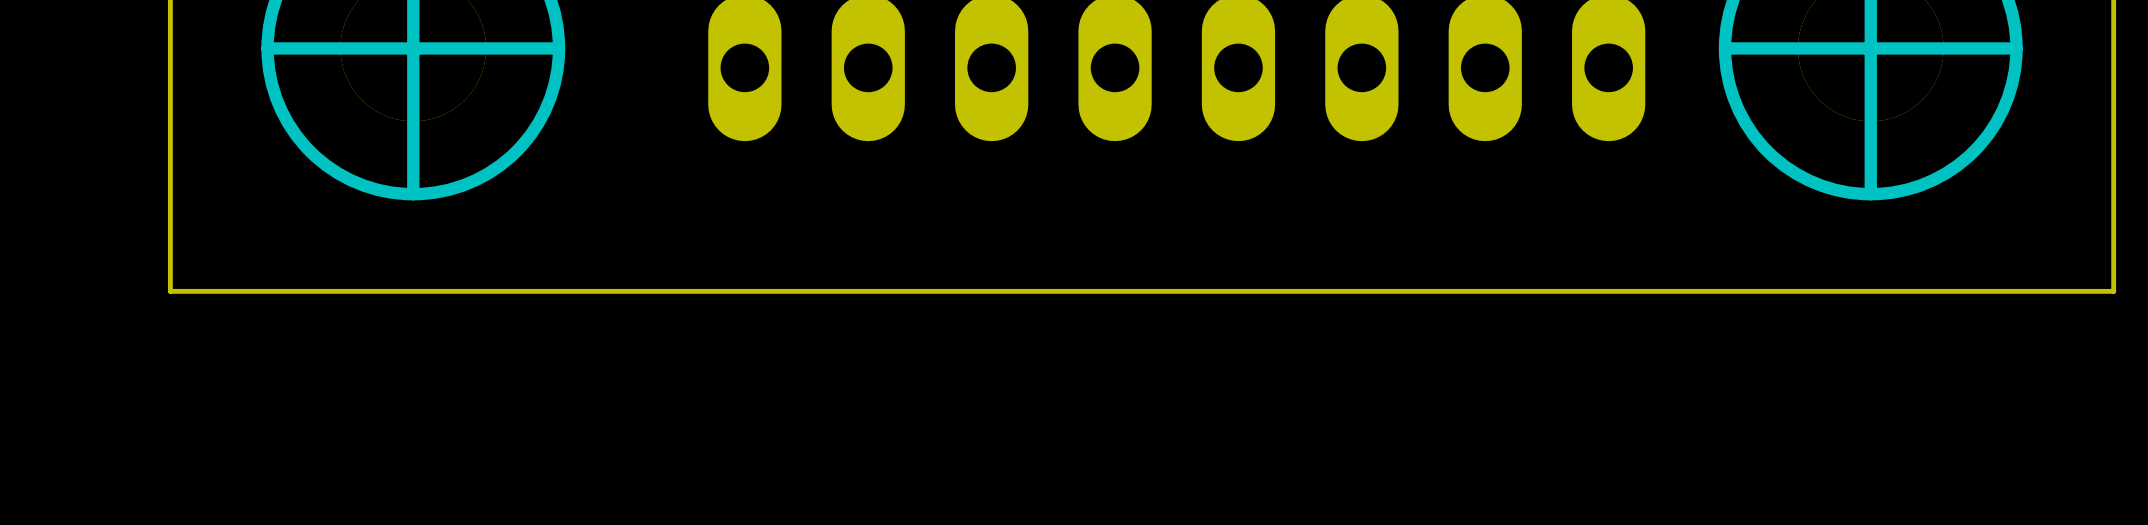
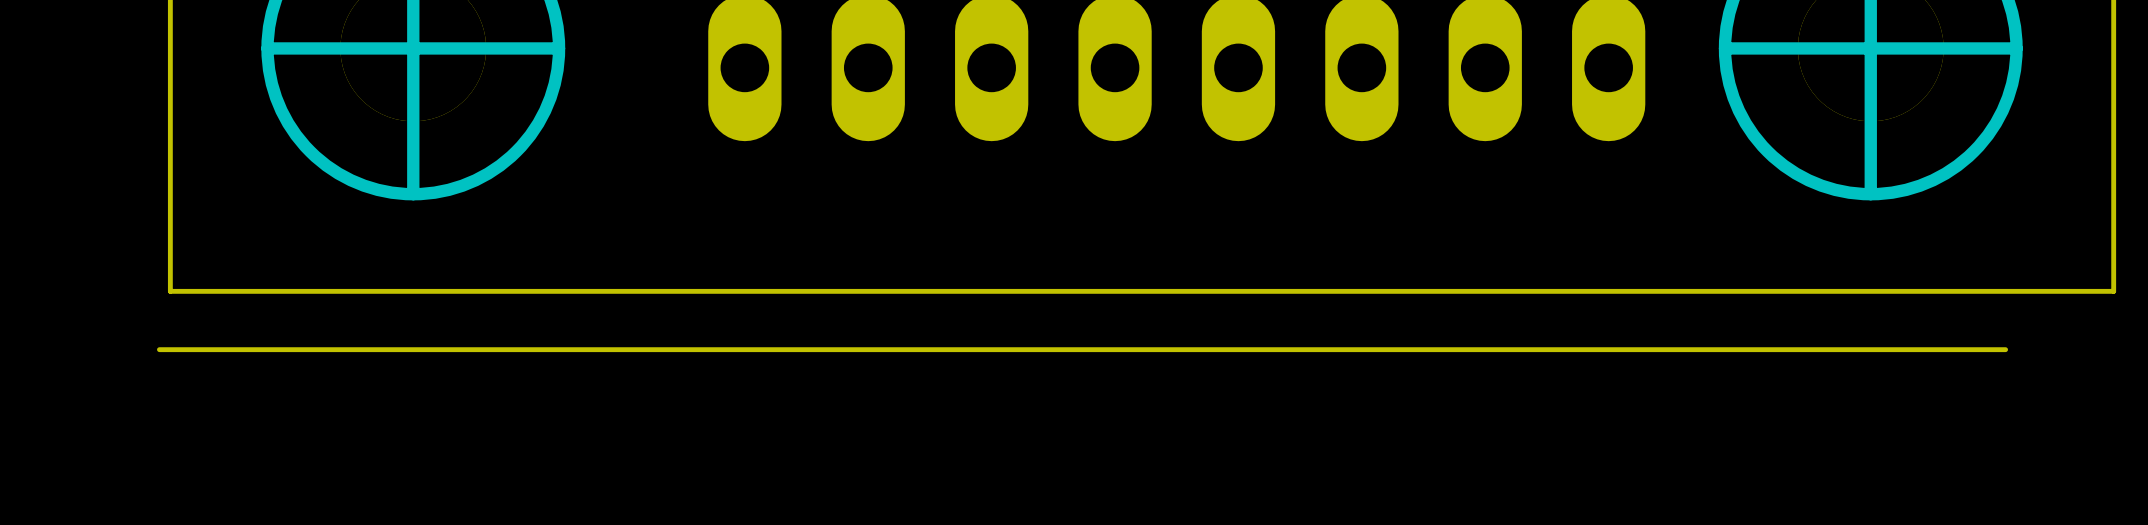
board edge: none -> (159, 349) (2005, 349)

